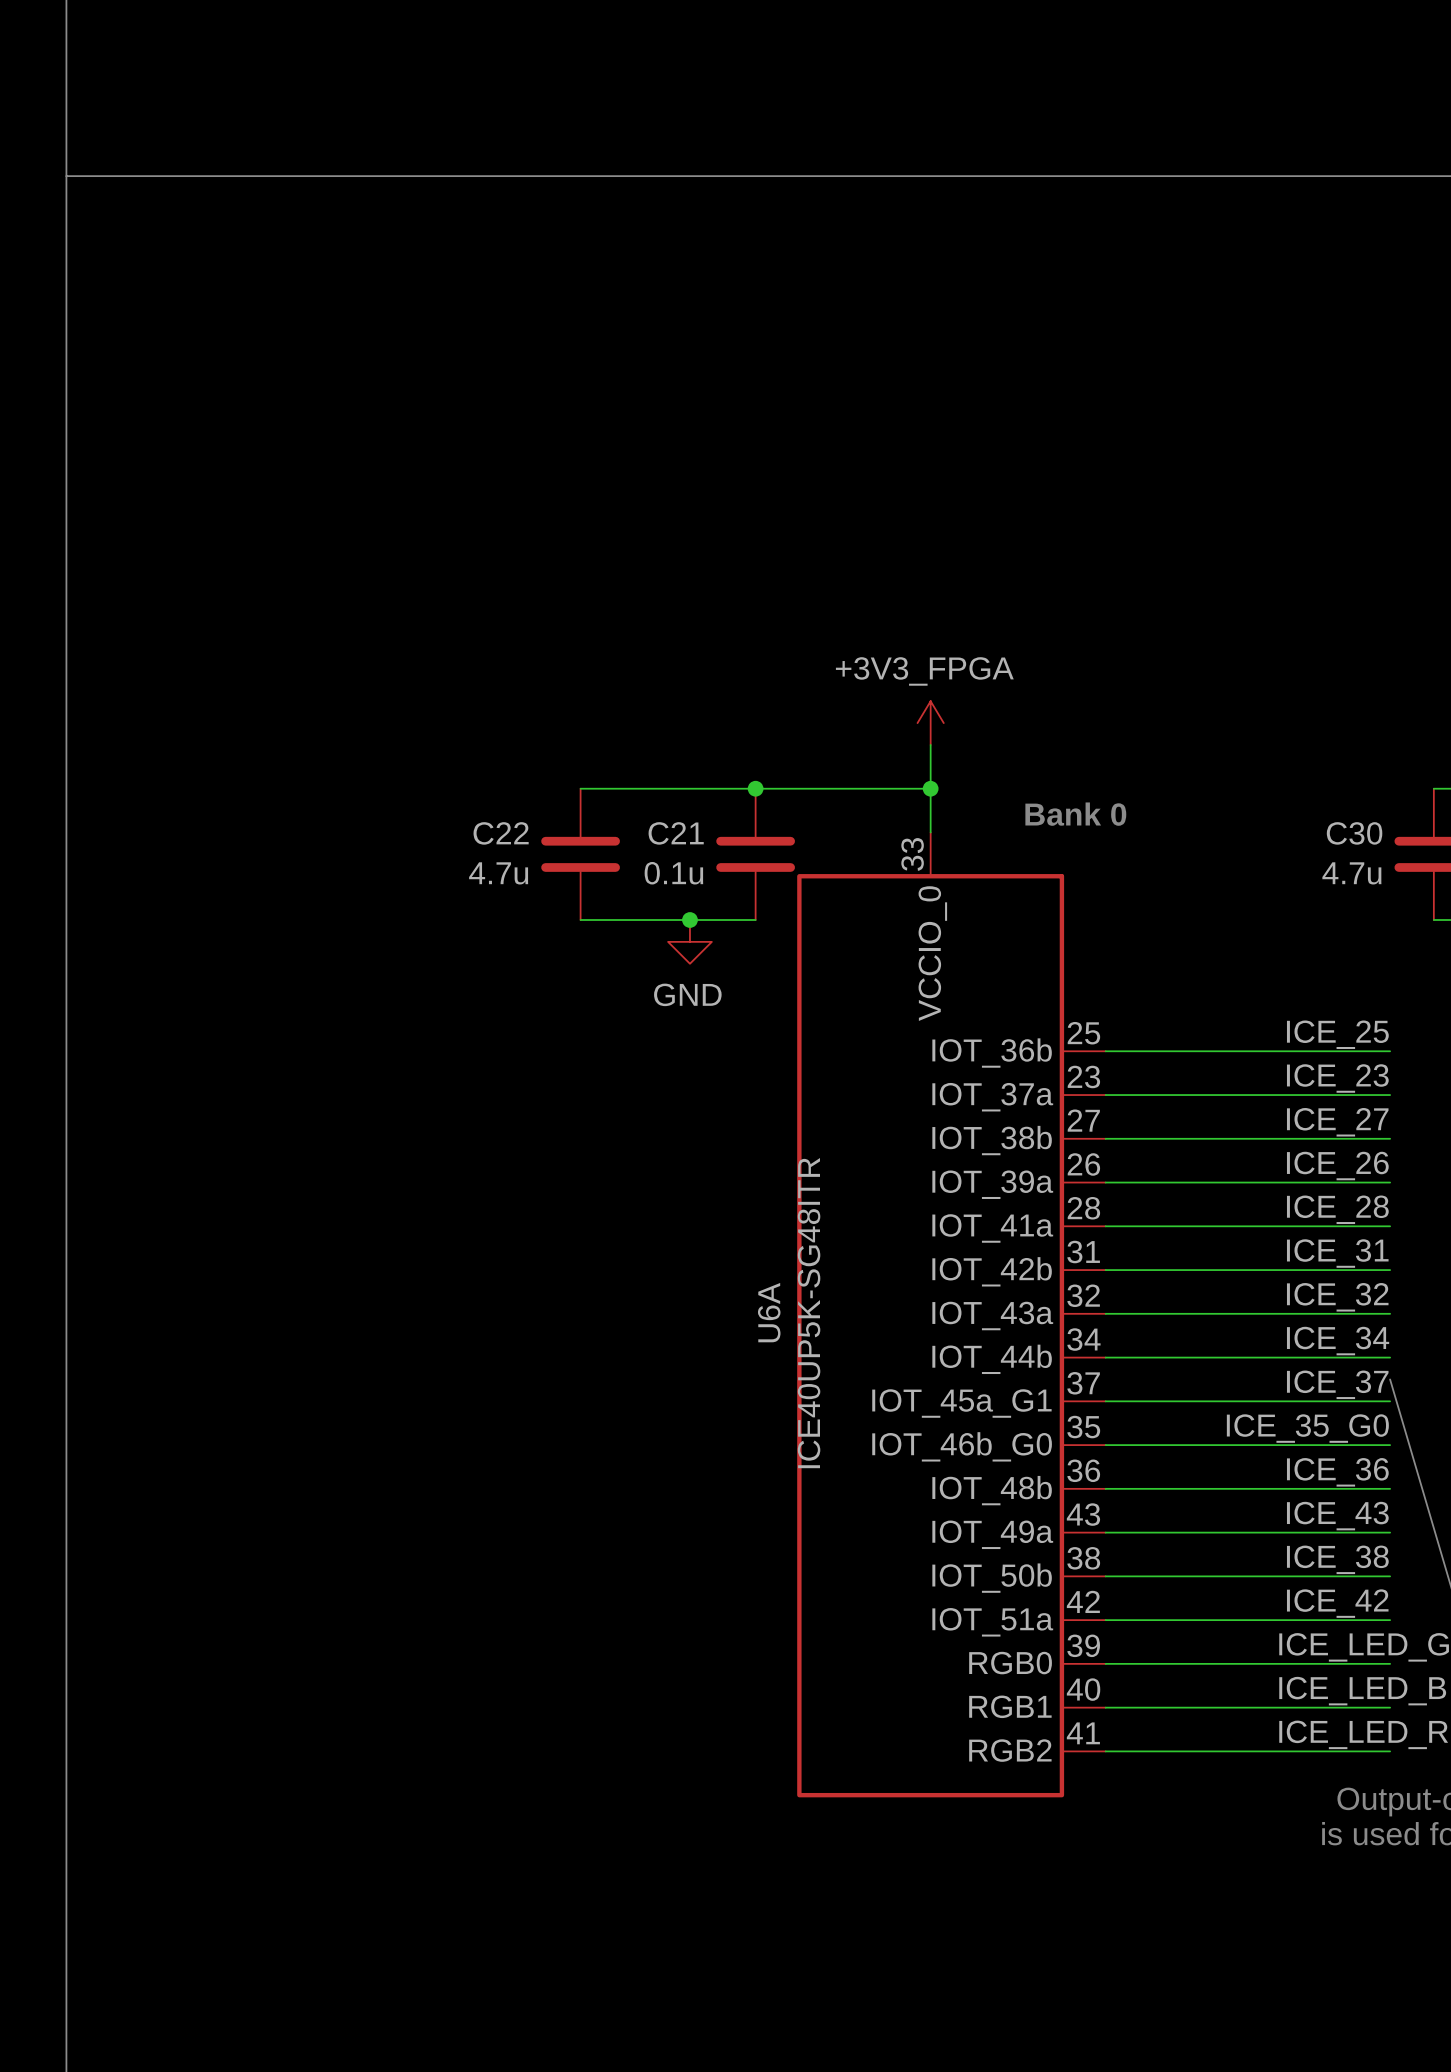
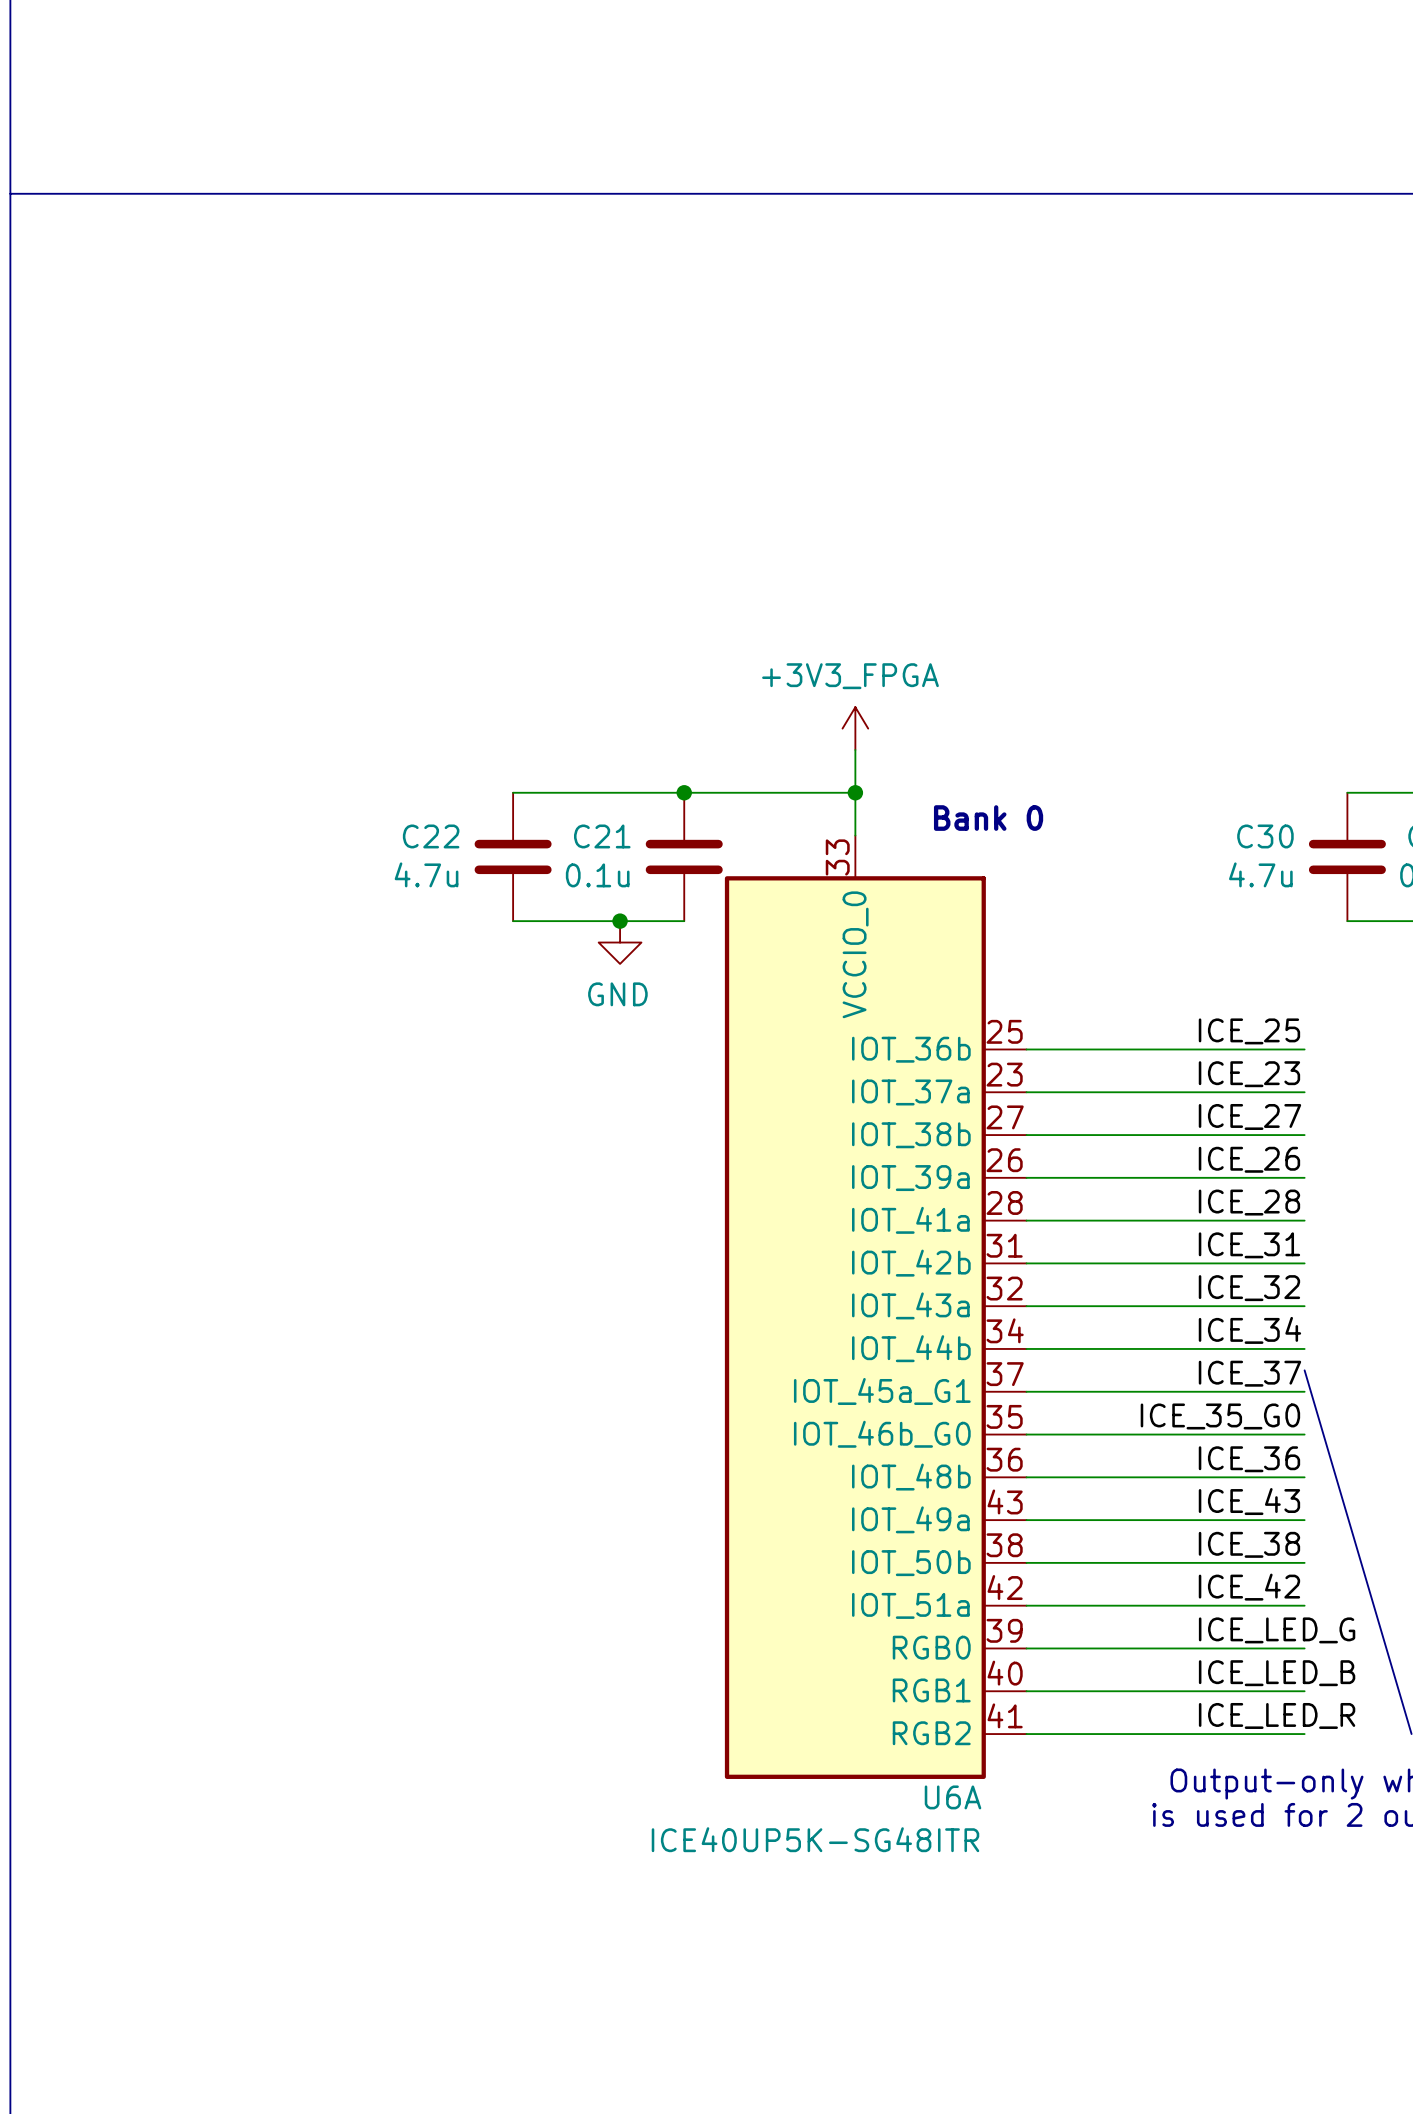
U6A name rotation: 0° (769, 1312) -> 90° clockwise (953, 1797)
U6A name position: U6A (769, 1312) -> U6A (953, 1797)
U6A value rotation: 0° (809, 1313) -> 90° clockwise (815, 1839)
U6A value position: ICE40UP5K-SG48ITR (809, 1313) -> ICE40UP5K-SG48ITR (815, 1839)

